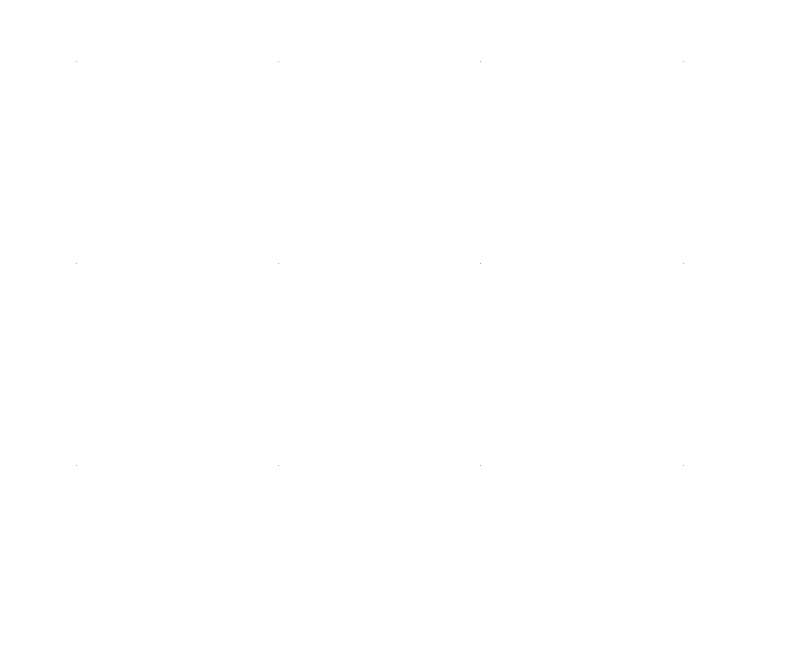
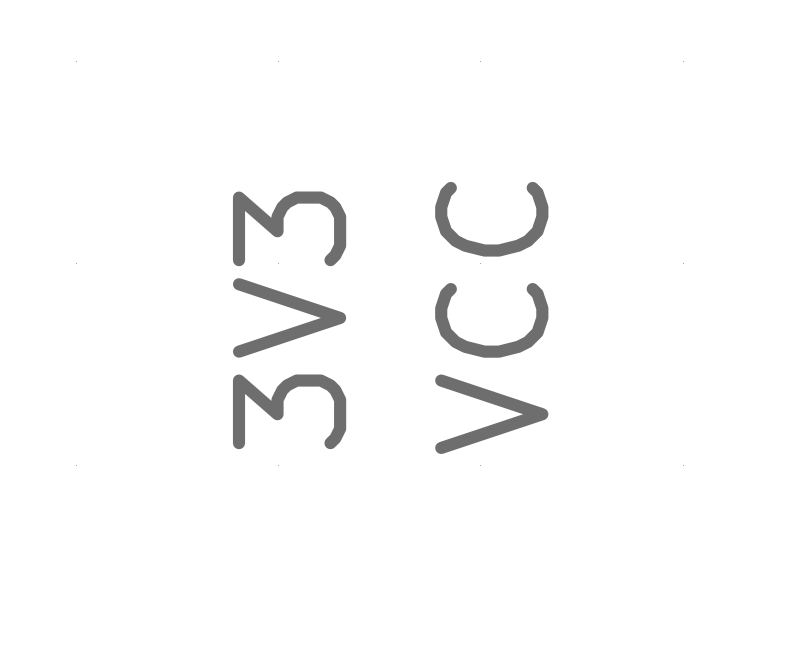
label: none -> VCC (491, 317)
label: none -> 3V3 (289, 320)

